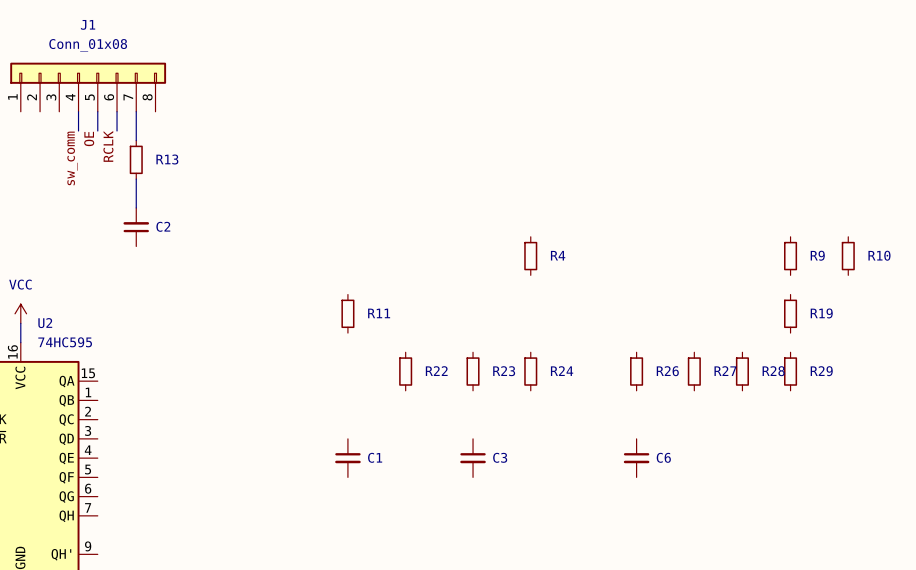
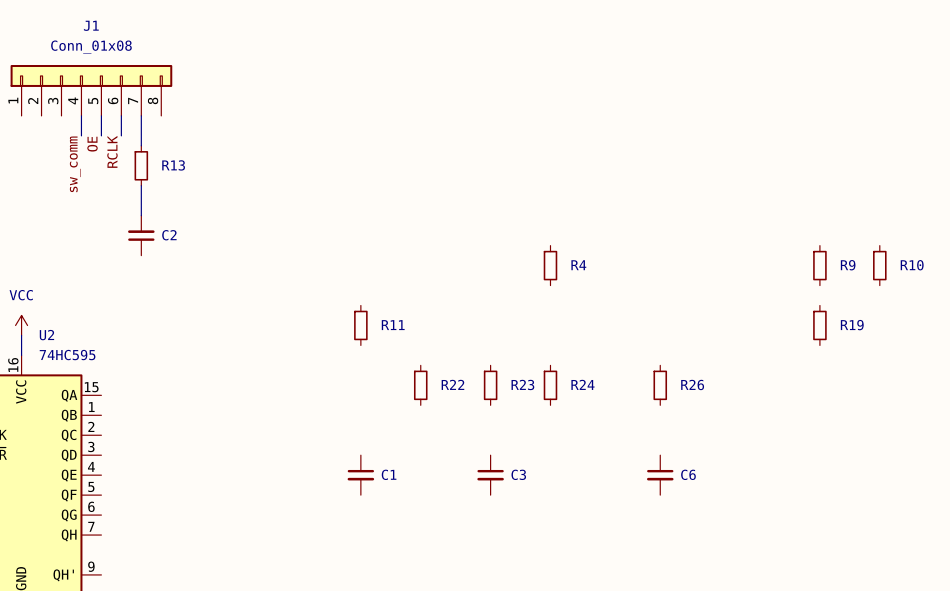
R27: (694, 371) -> none
R28: (742, 371) -> none
R29: (790, 371) -> none

